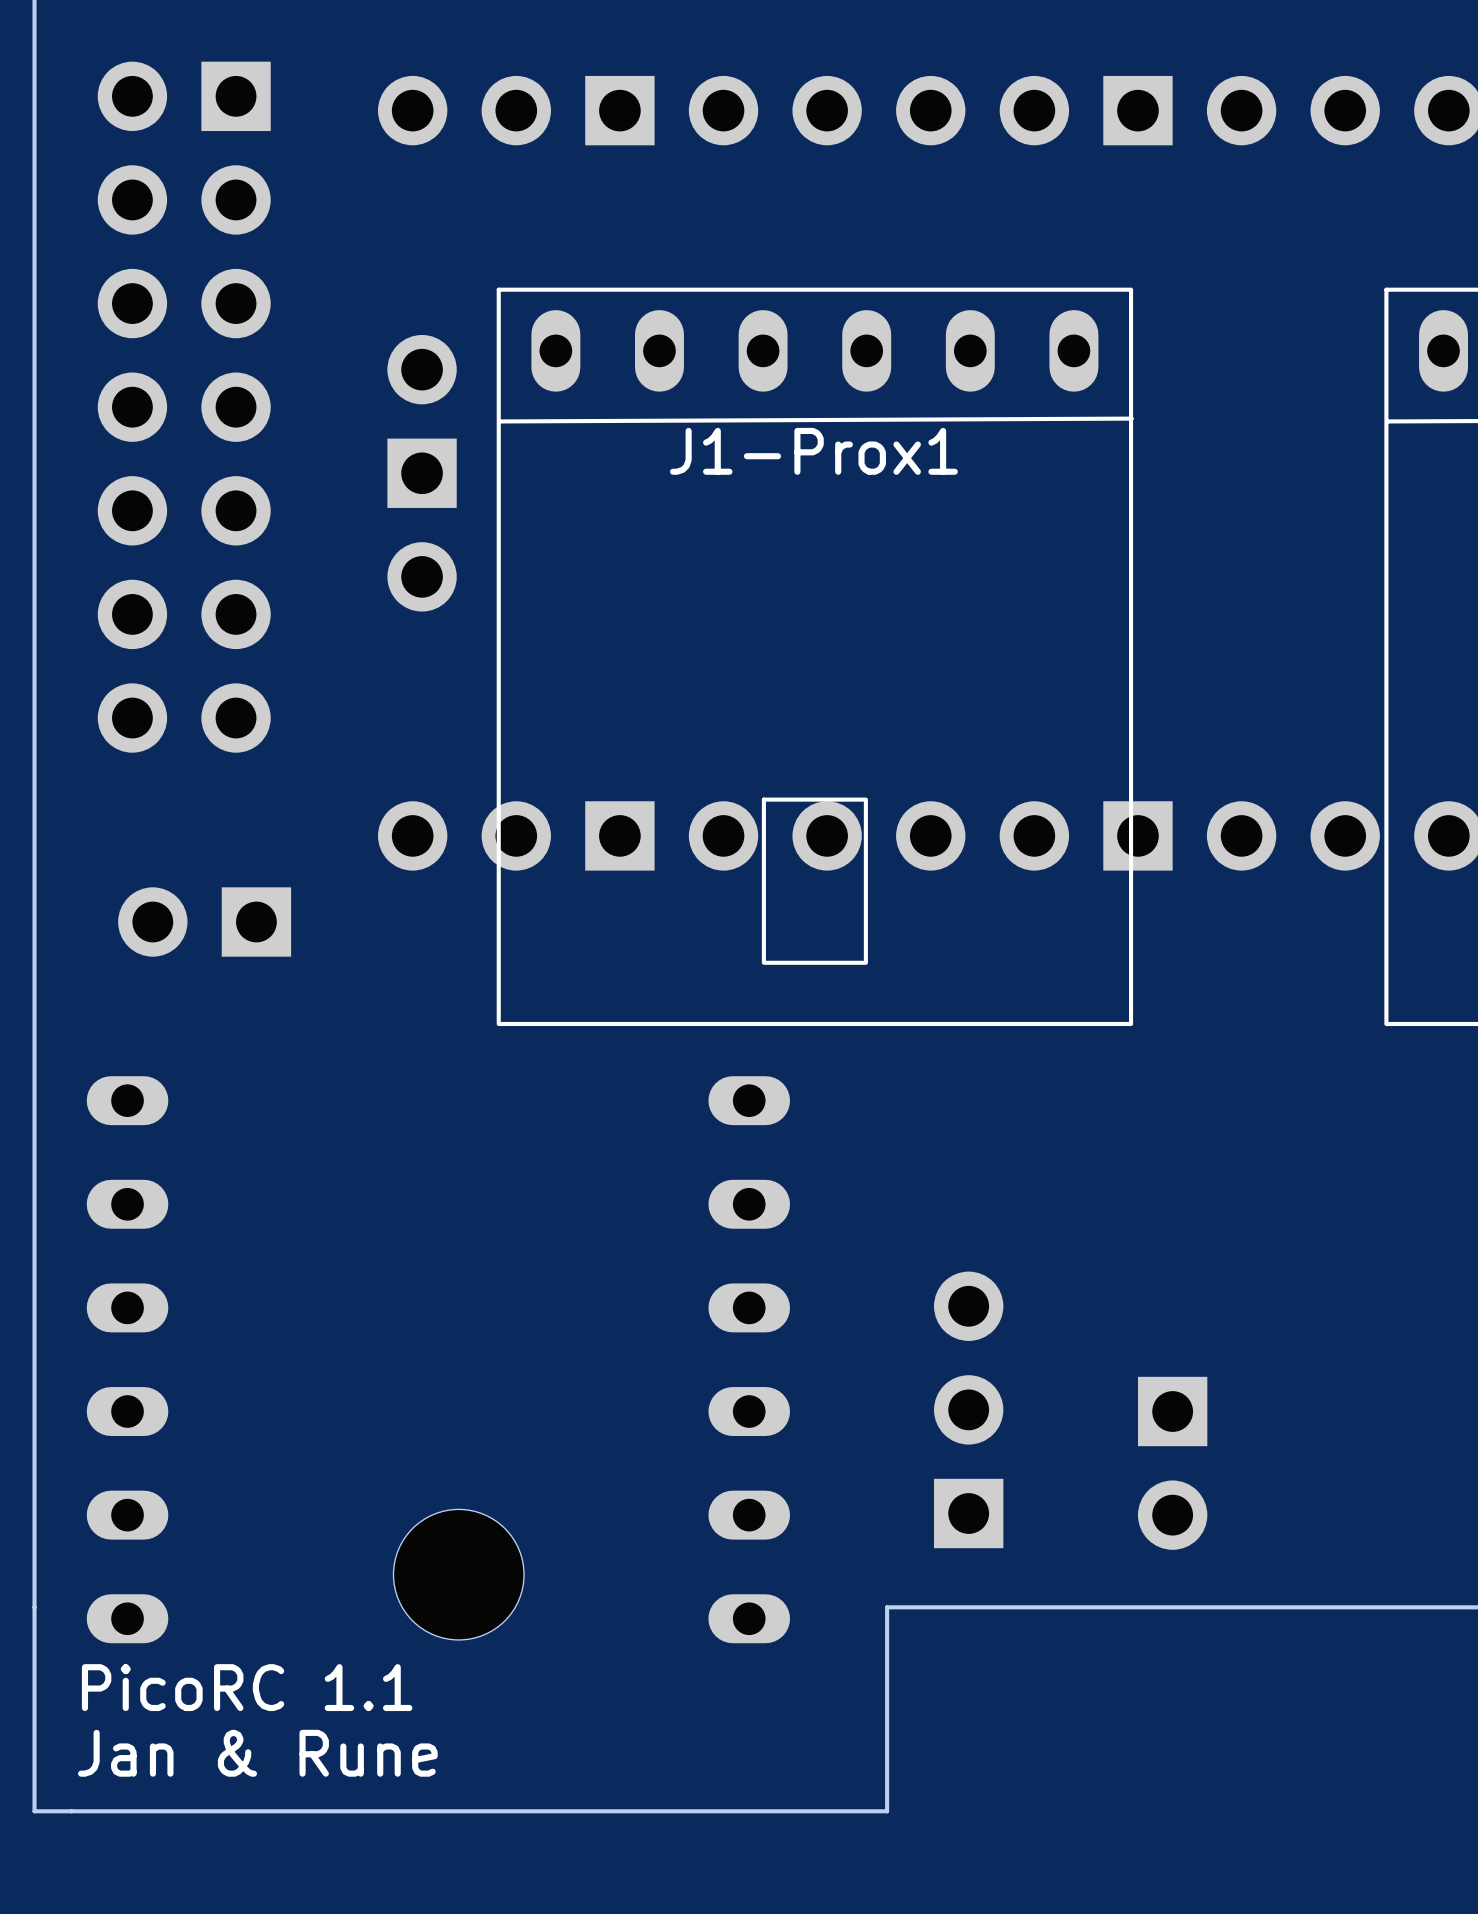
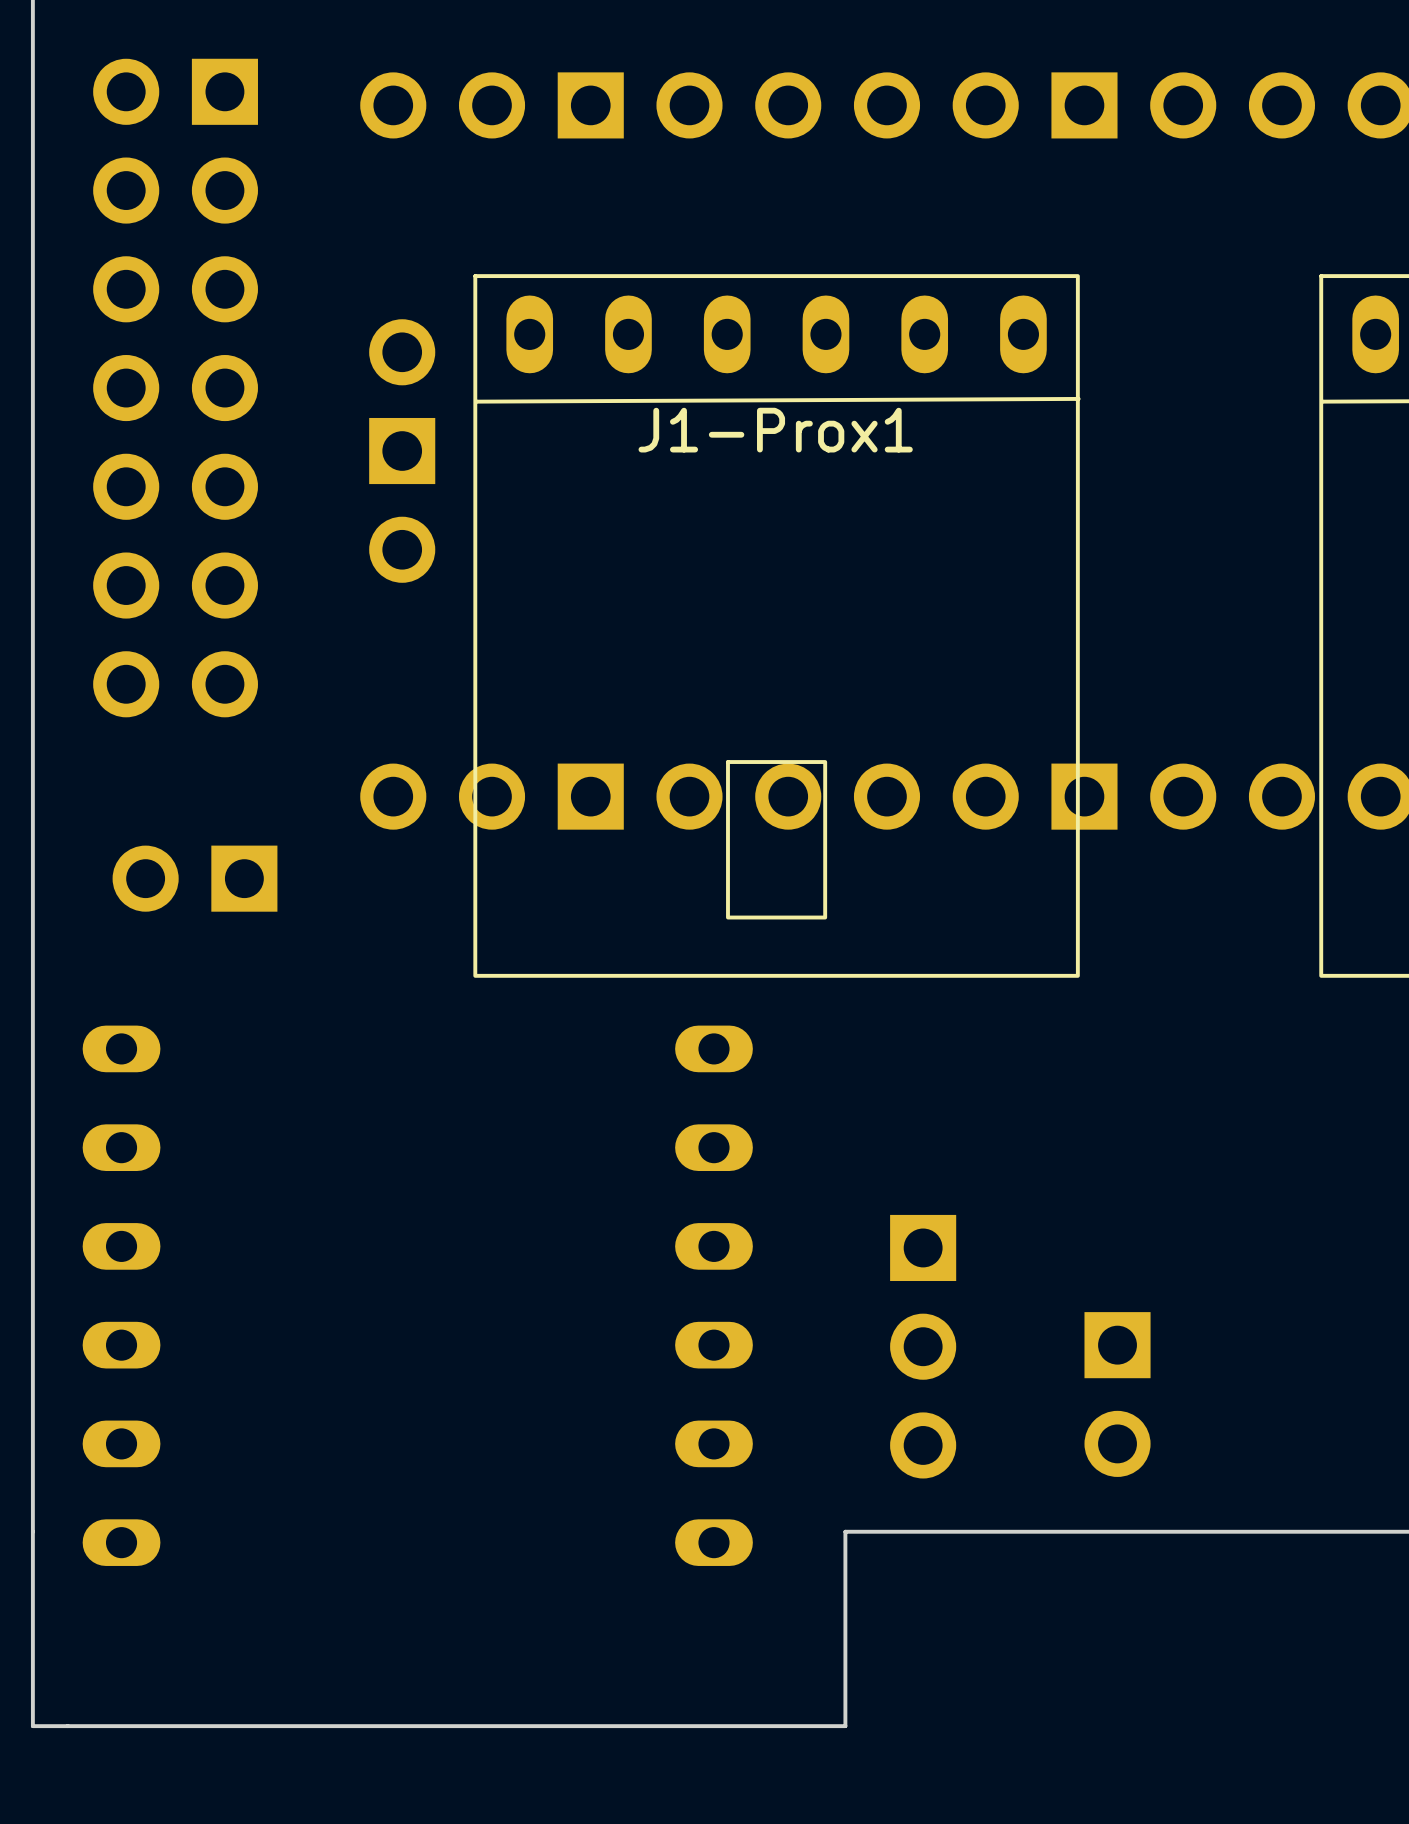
part rotation: 0° (968, 1409) -> 180° (923, 1346)
part: (458, 1574) -> none
text: PicoRC 1.1 (247, 1687) -> none
text: Jan & Rune (257, 1753) -> none

